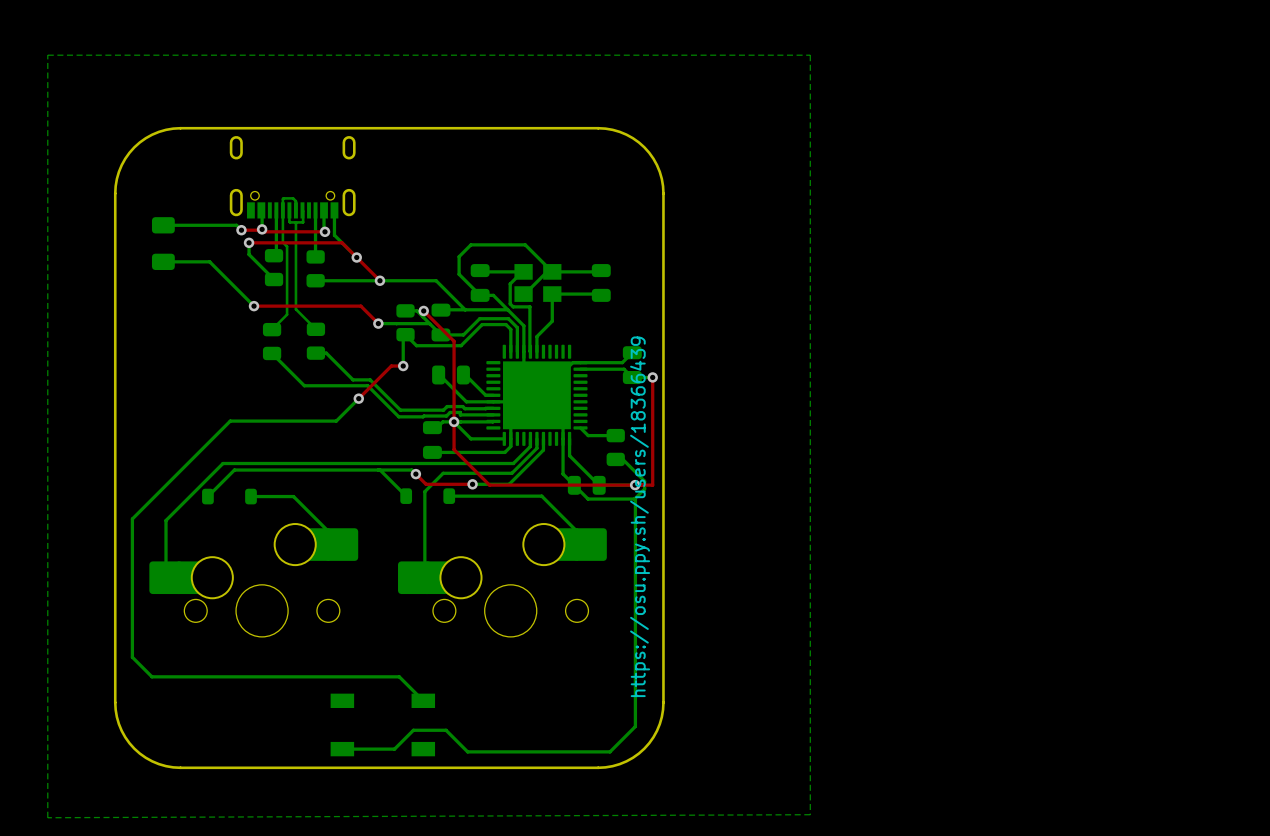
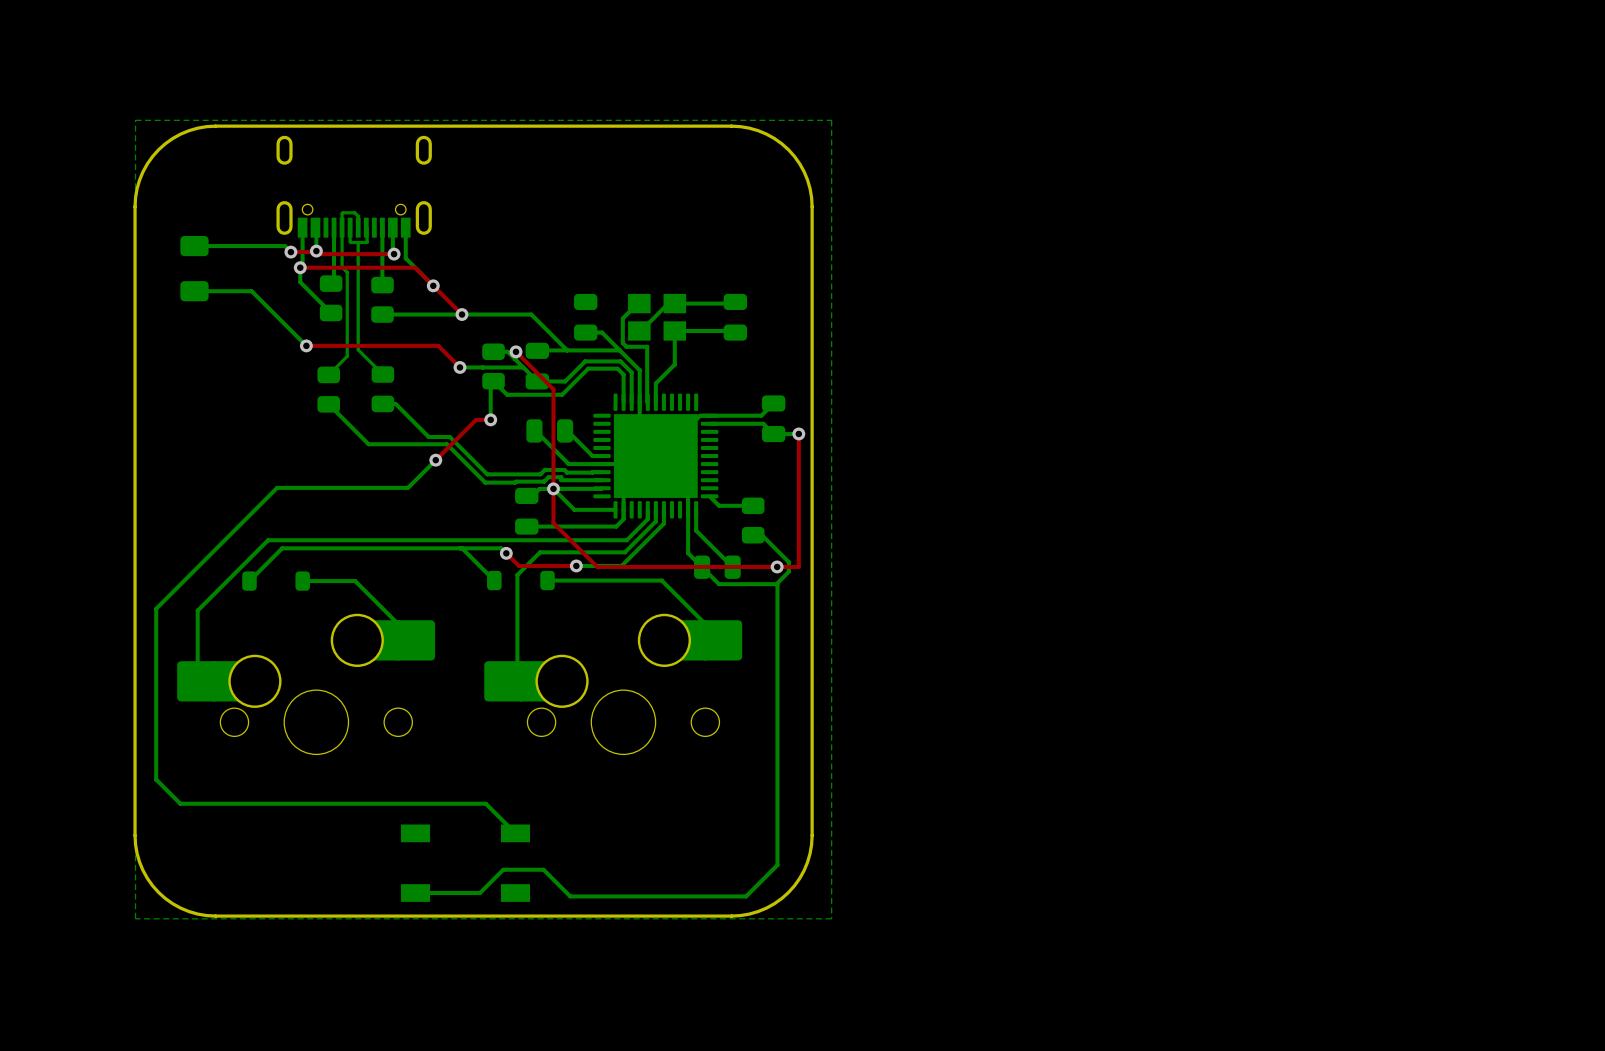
bottom zone outline: (47, 55) (810, 55) (810, 814) (47, 817) (47, 55) -> (135, 120) (135, 918) (831, 918) (831, 120) (135, 120)
bottom track: none -> (302, 227) (302, 265) (300, 267)
bottom track: (480, 270) (522, 271) -> none
bottom track: (552, 271) (525, 244) (470, 244) (459, 256) (459, 274) (480, 295) -> none
text: https://osu.ppy.sh/users/18366439 (640, 516) -> none

